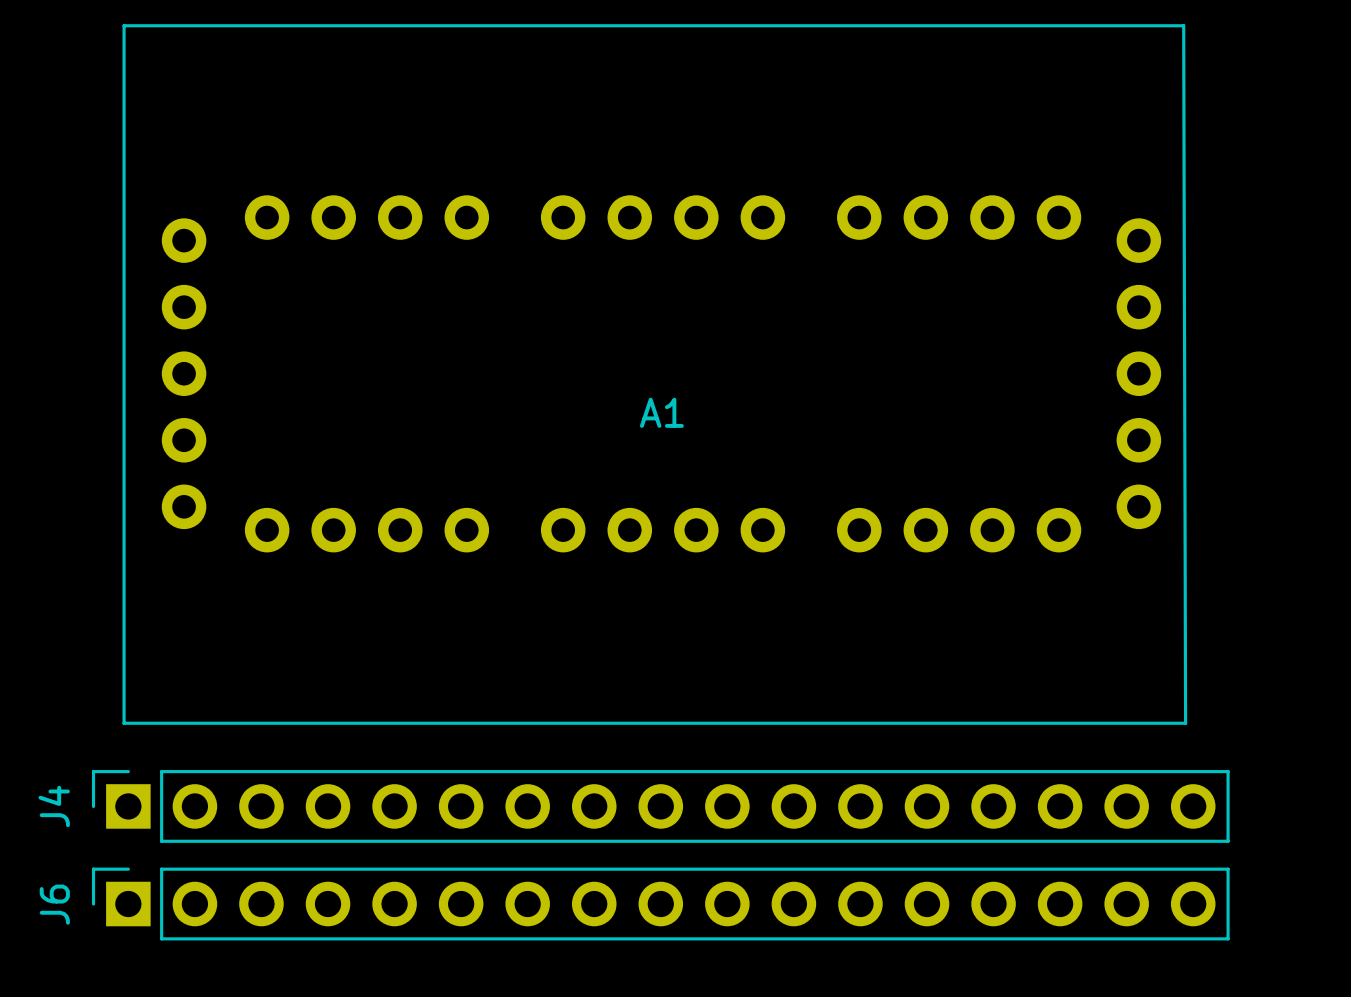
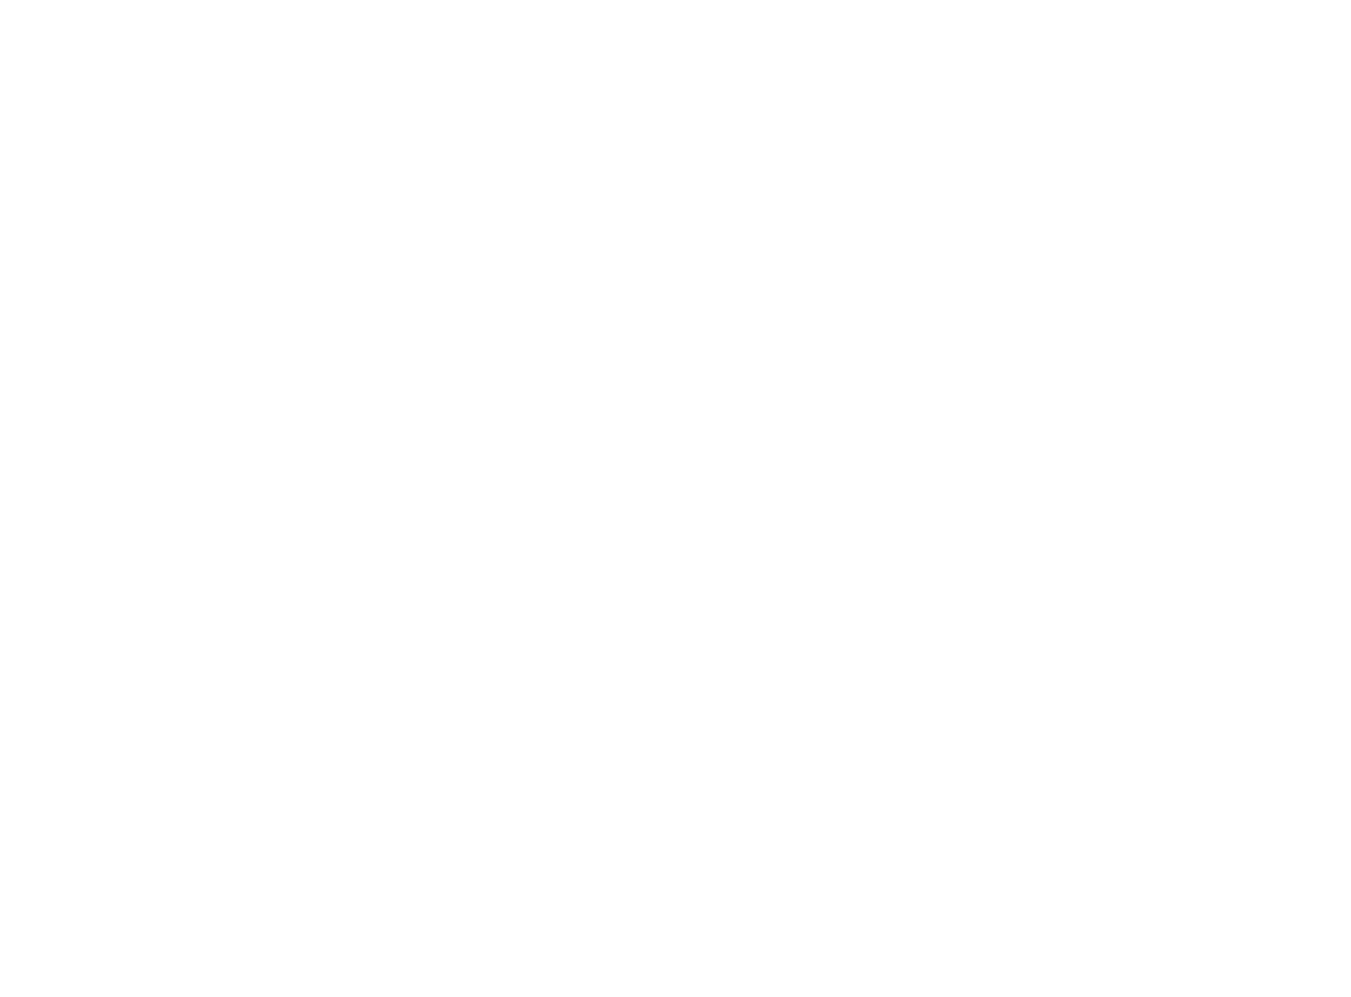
A1: (654, 374) -> none
J4: (660, 806) -> none
J6: (660, 904) -> none

